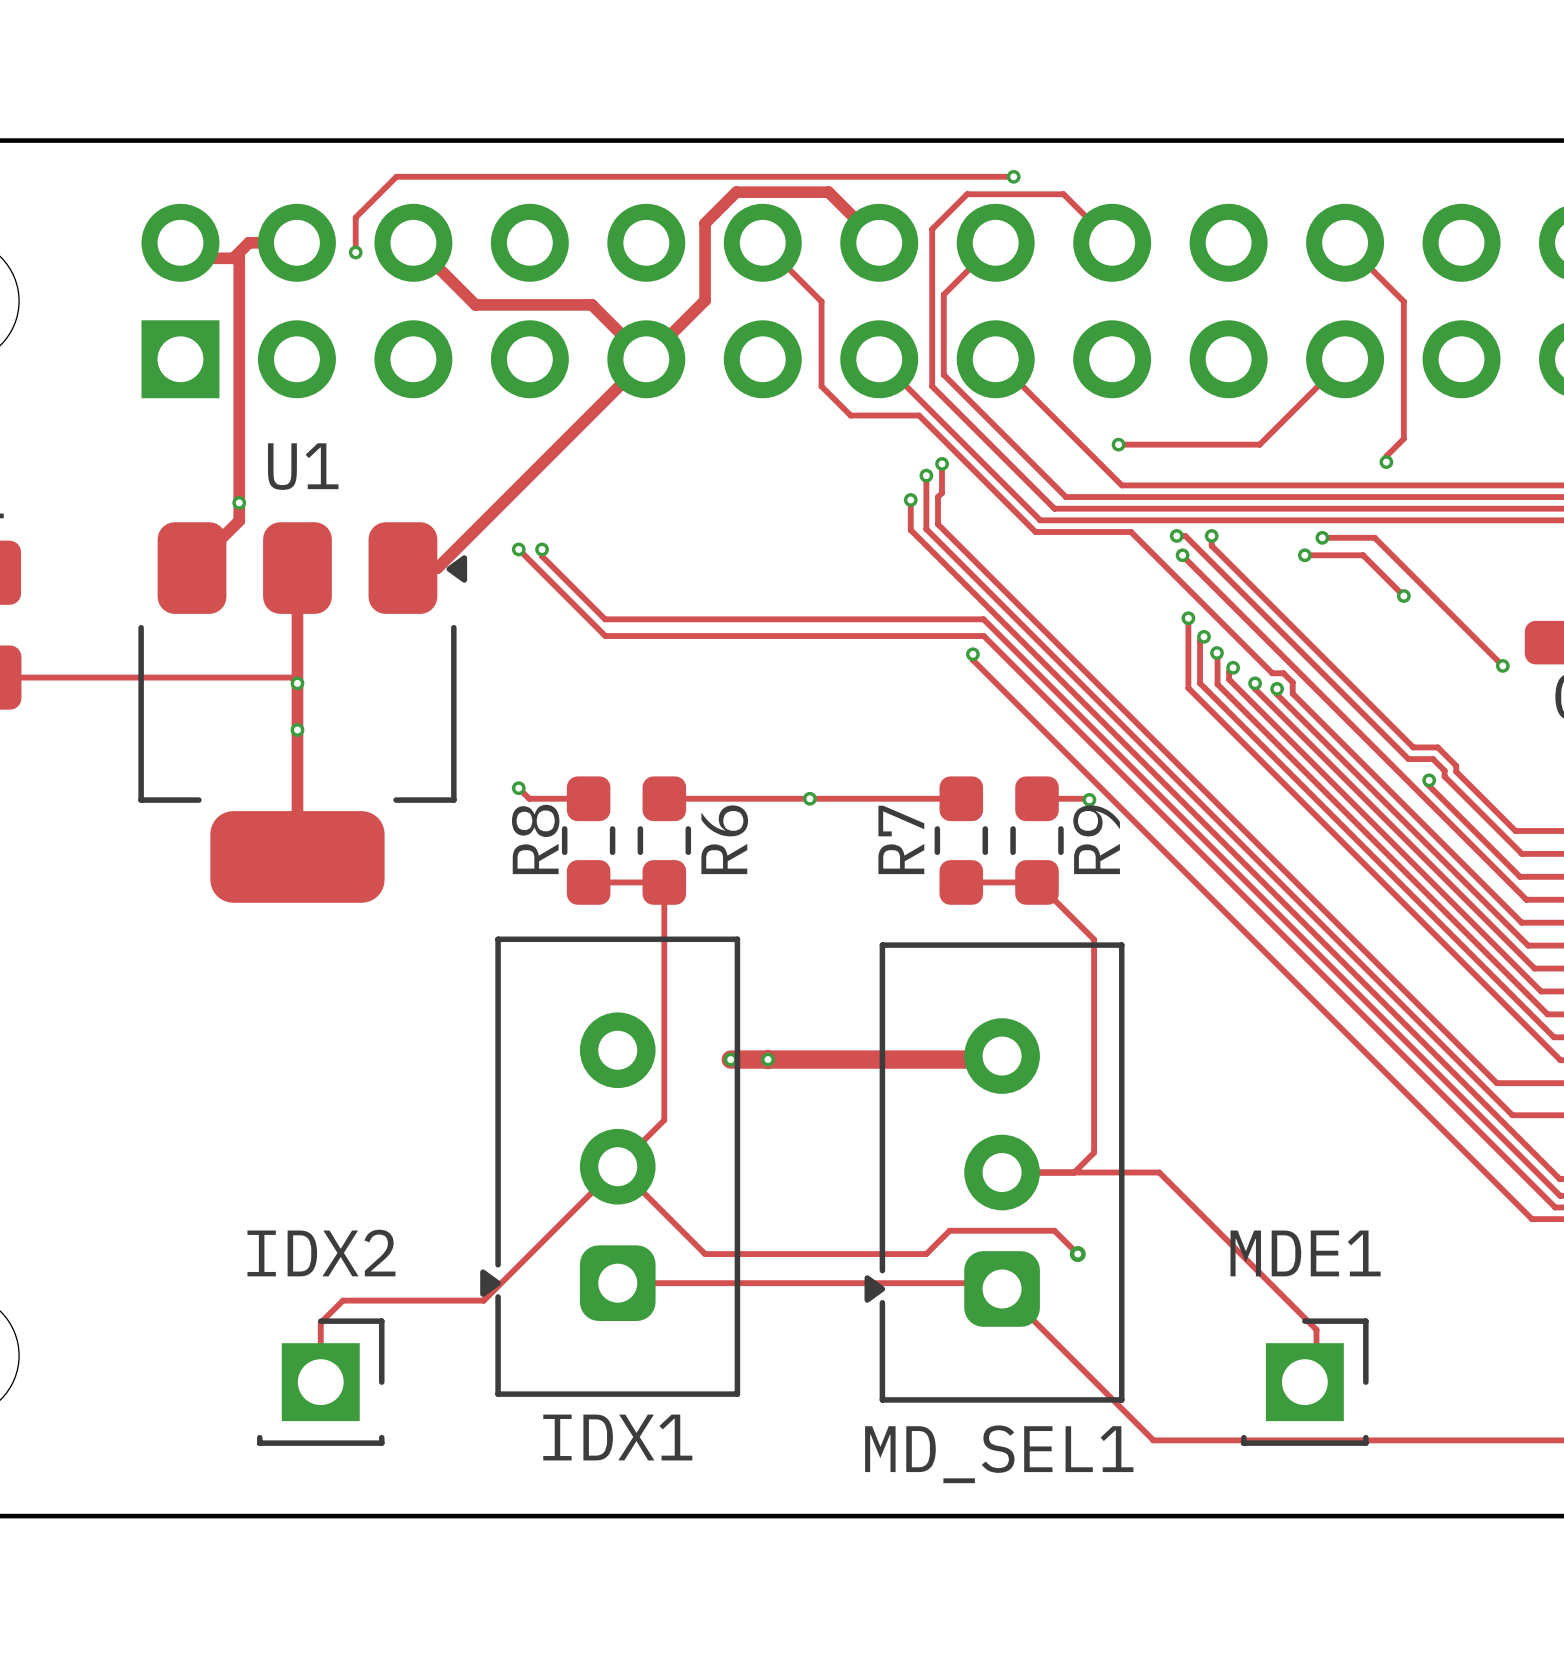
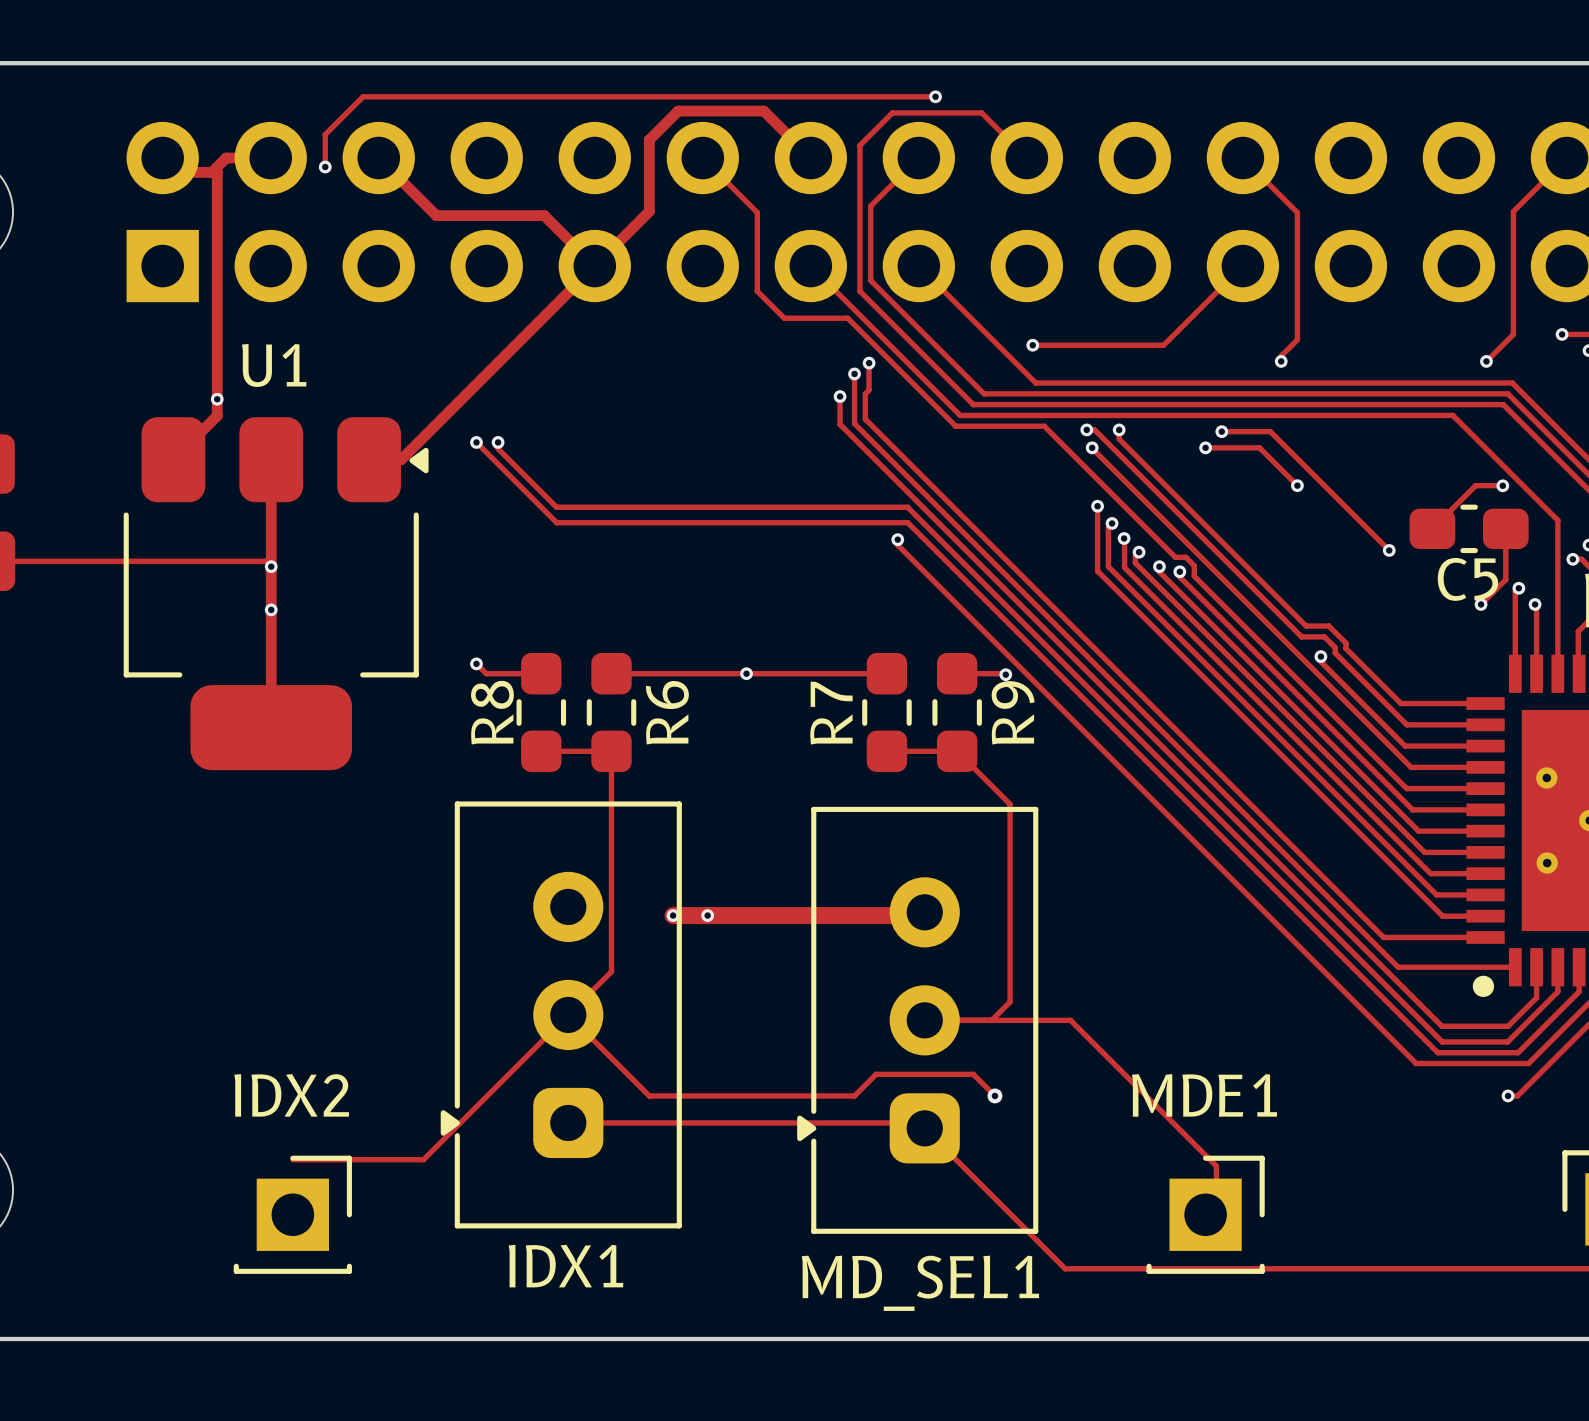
track: (483, 1300) (342, 1300) (320, 1322) (320, 1382) -> (444, 1139) (423, 1159) (292, 1159)

